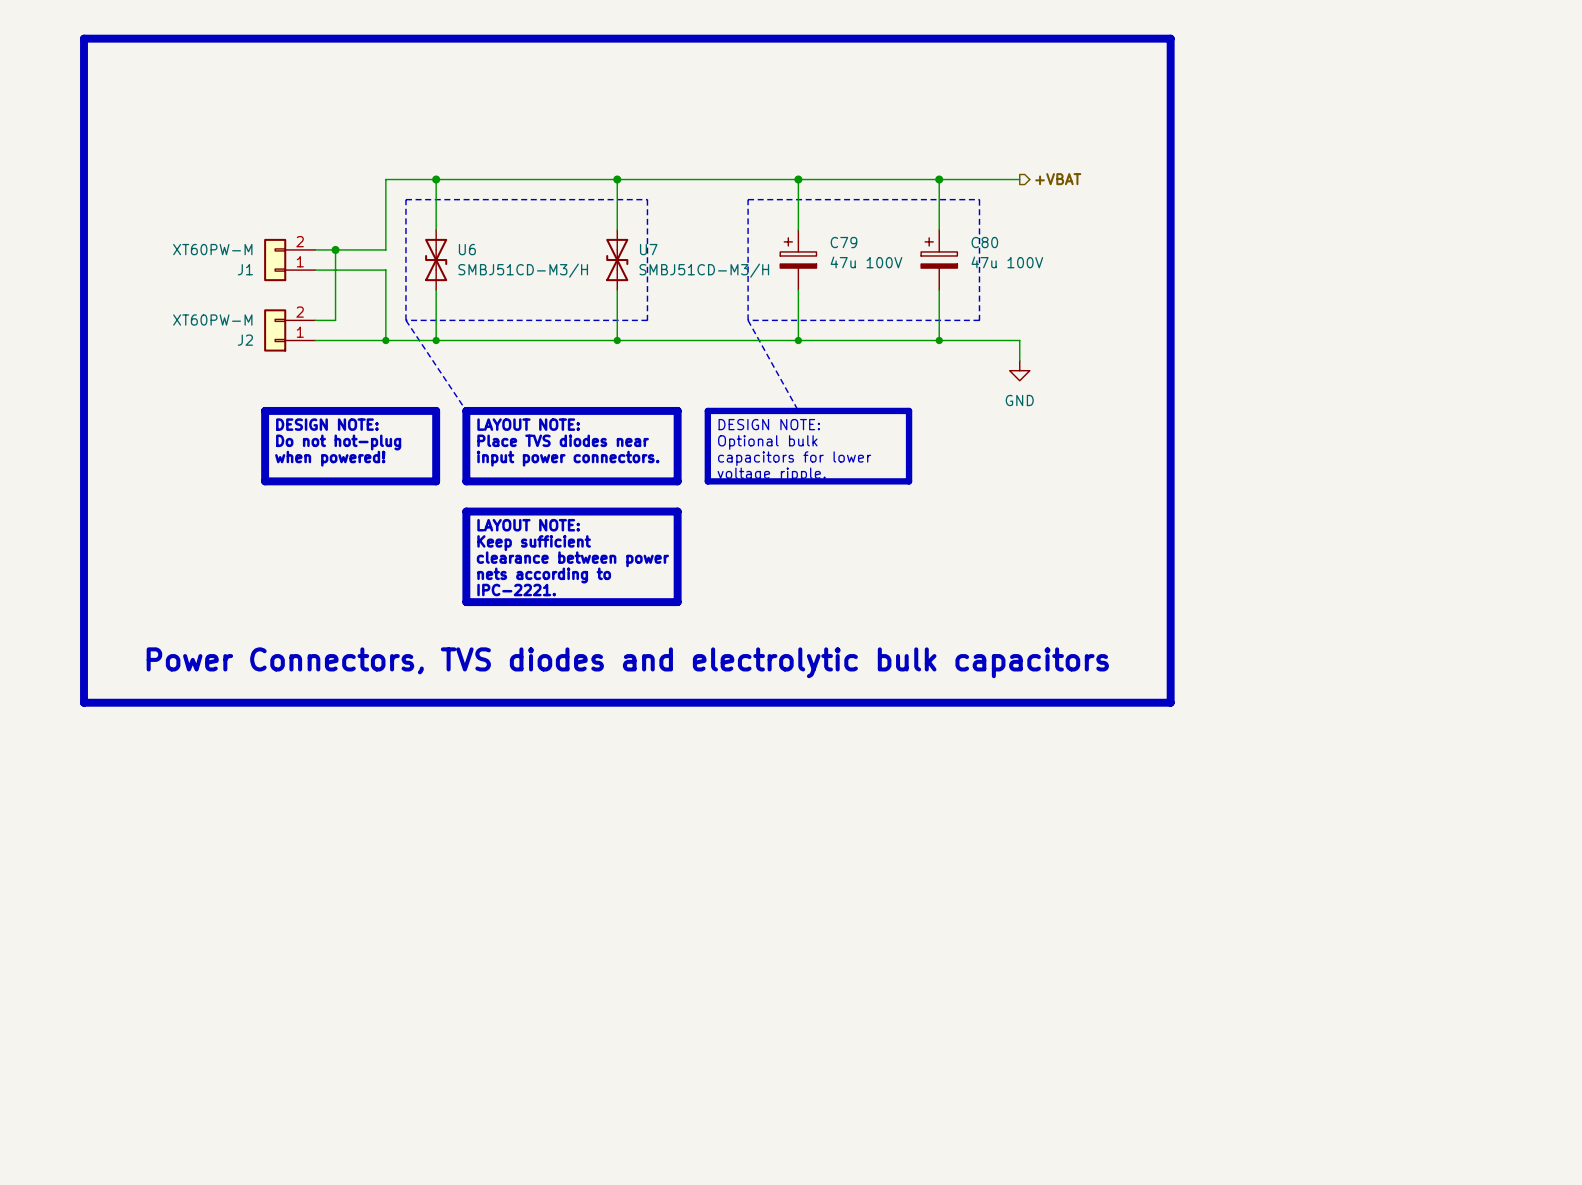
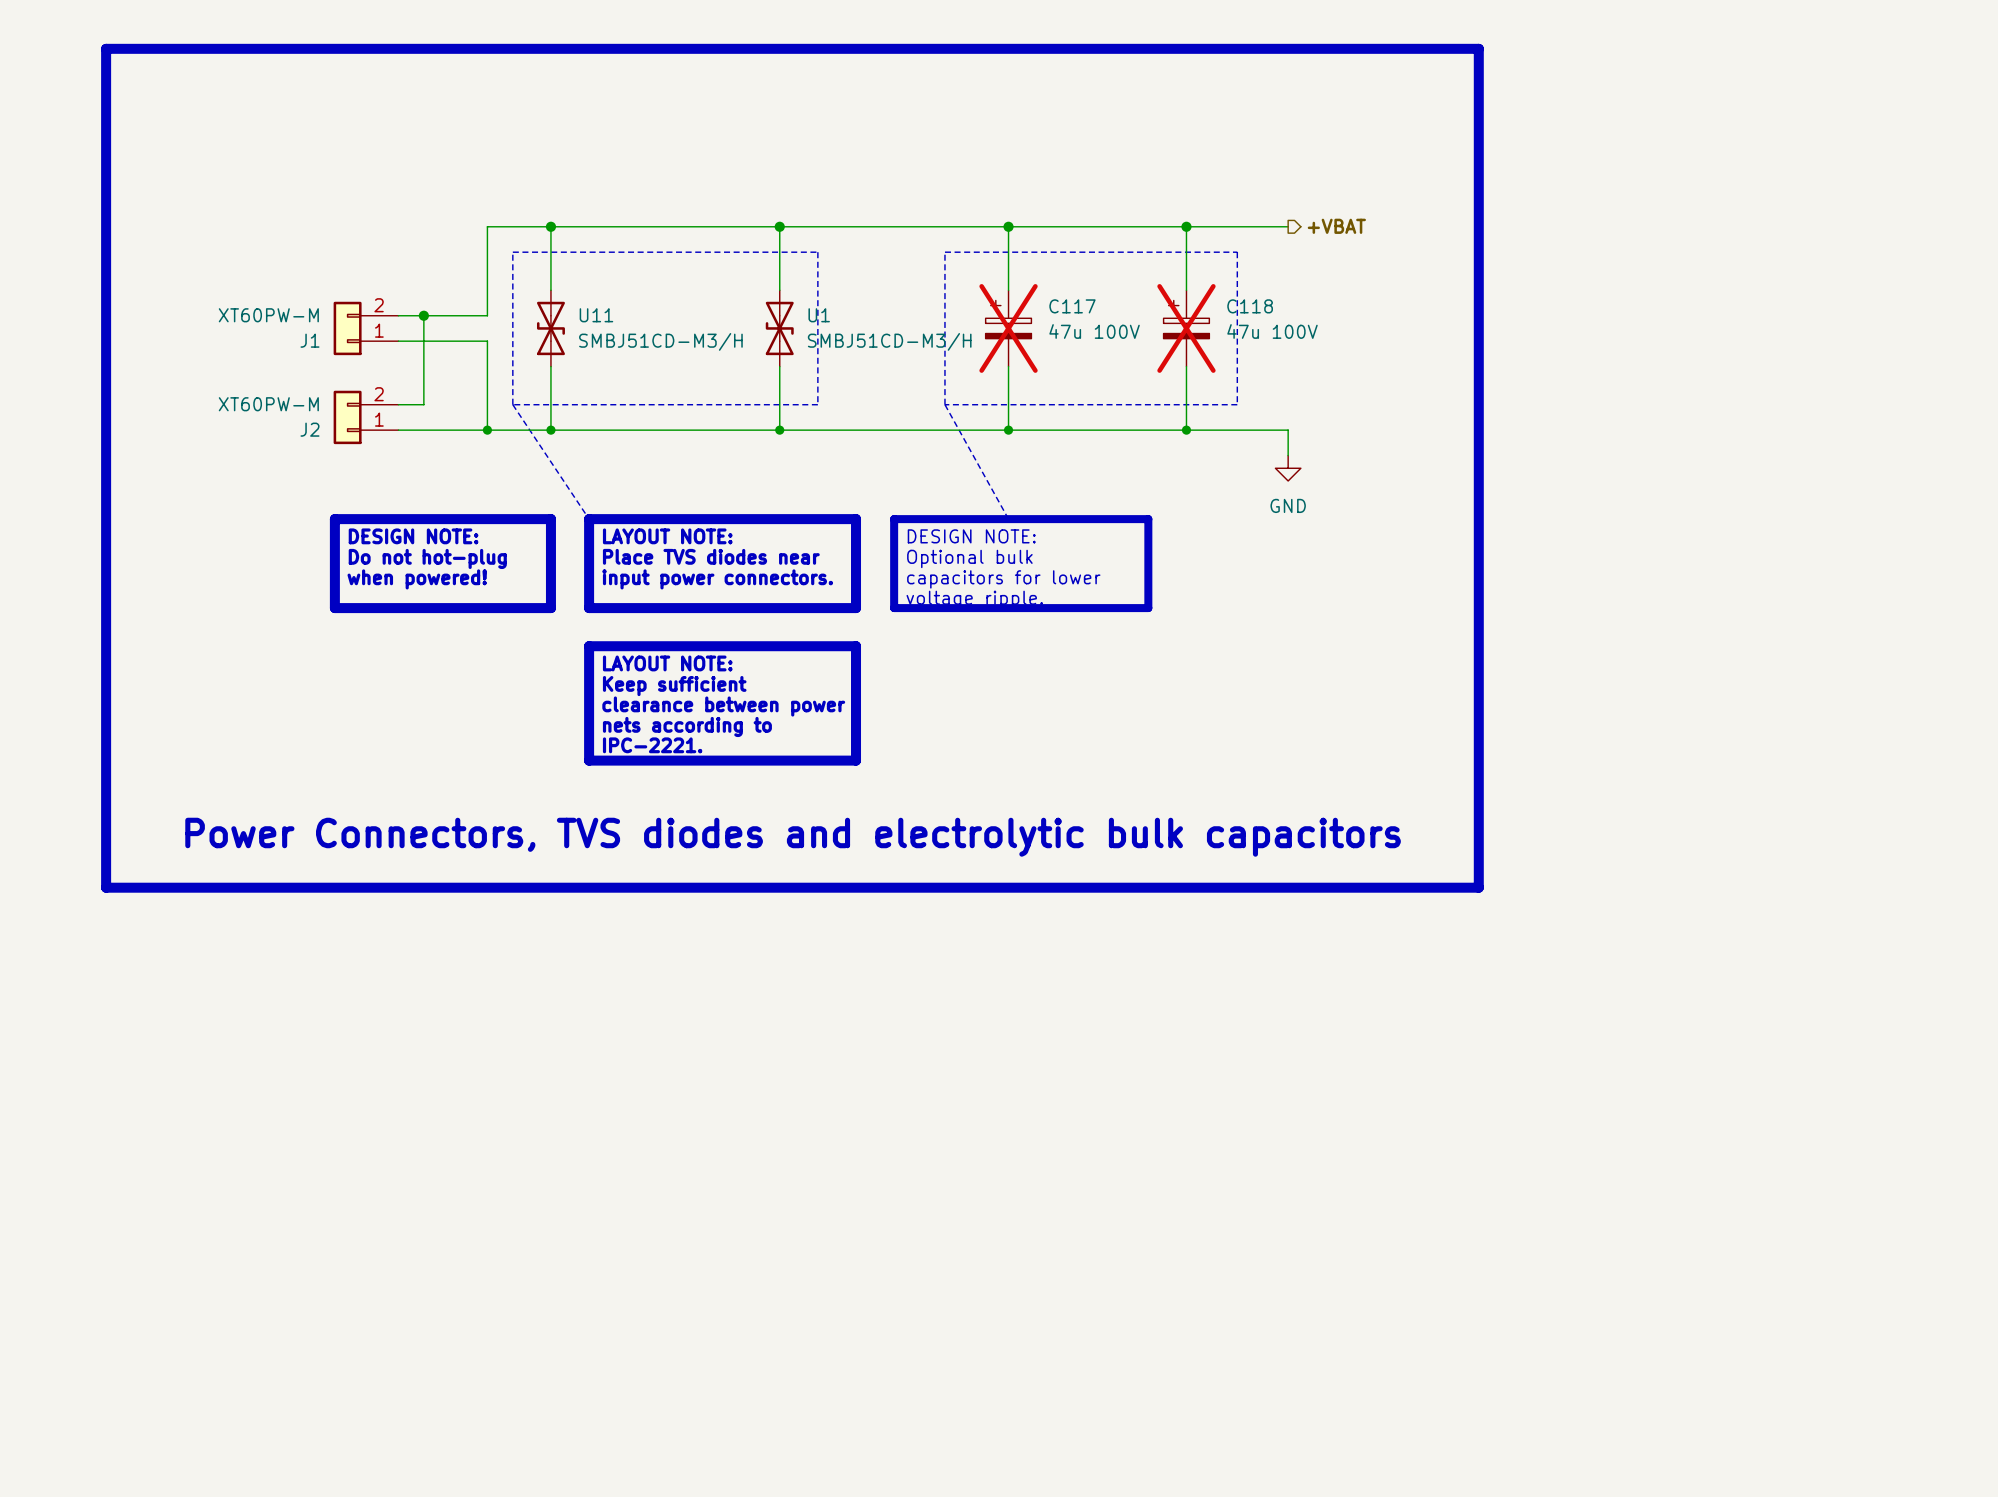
C79 name: C79 (843, 242) -> C117 (1072, 306)
C80 name: C80 (984, 242) -> C118 (1250, 306)
U6 name: U6 (467, 249) -> U11 (596, 315)
U7 name: U7 (648, 249) -> U1 (819, 315)
C79 do-not-place cross: none -> (1008, 328)
C80 do-not-place cross: none -> (1186, 328)

